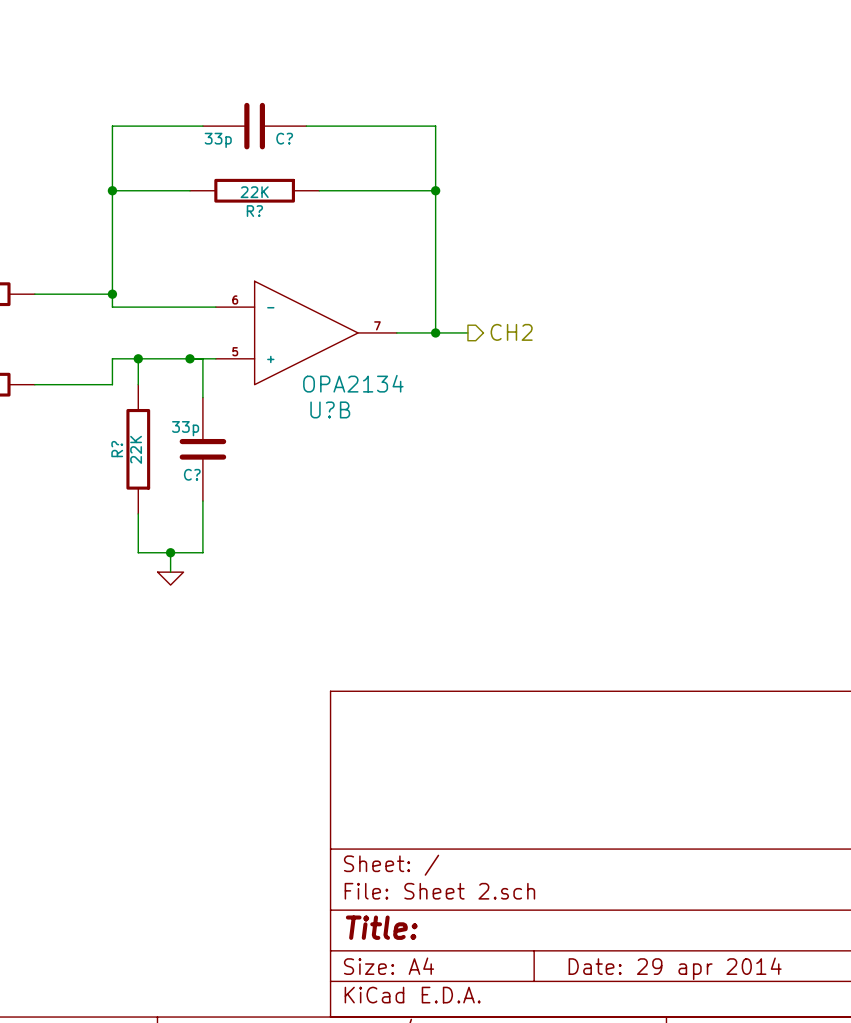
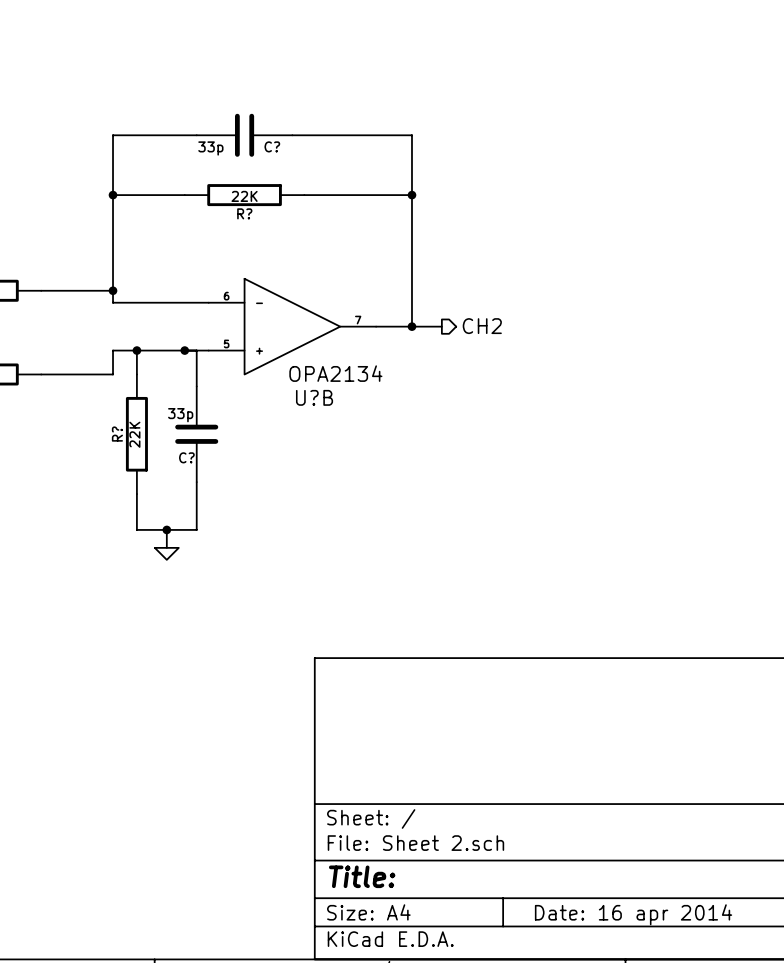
title block: Date: 29 apr 2014 (675, 968) -> Date: 16 apr 2014 (633, 914)

